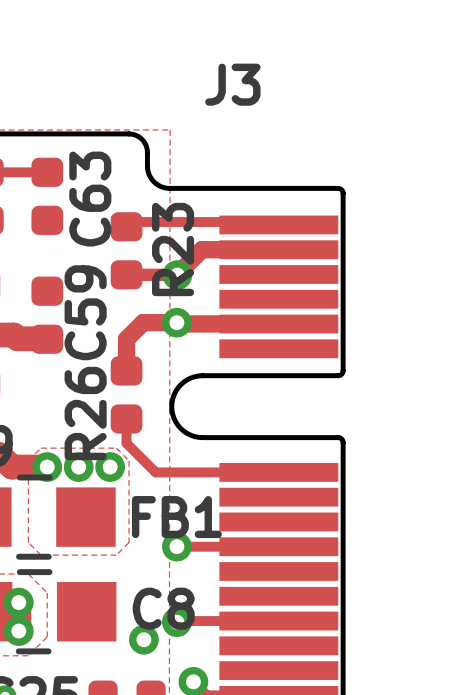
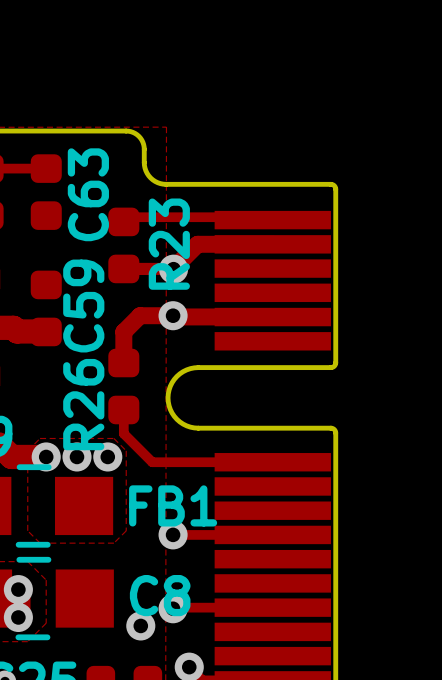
J3 name: J3 (232, 84) -> none

